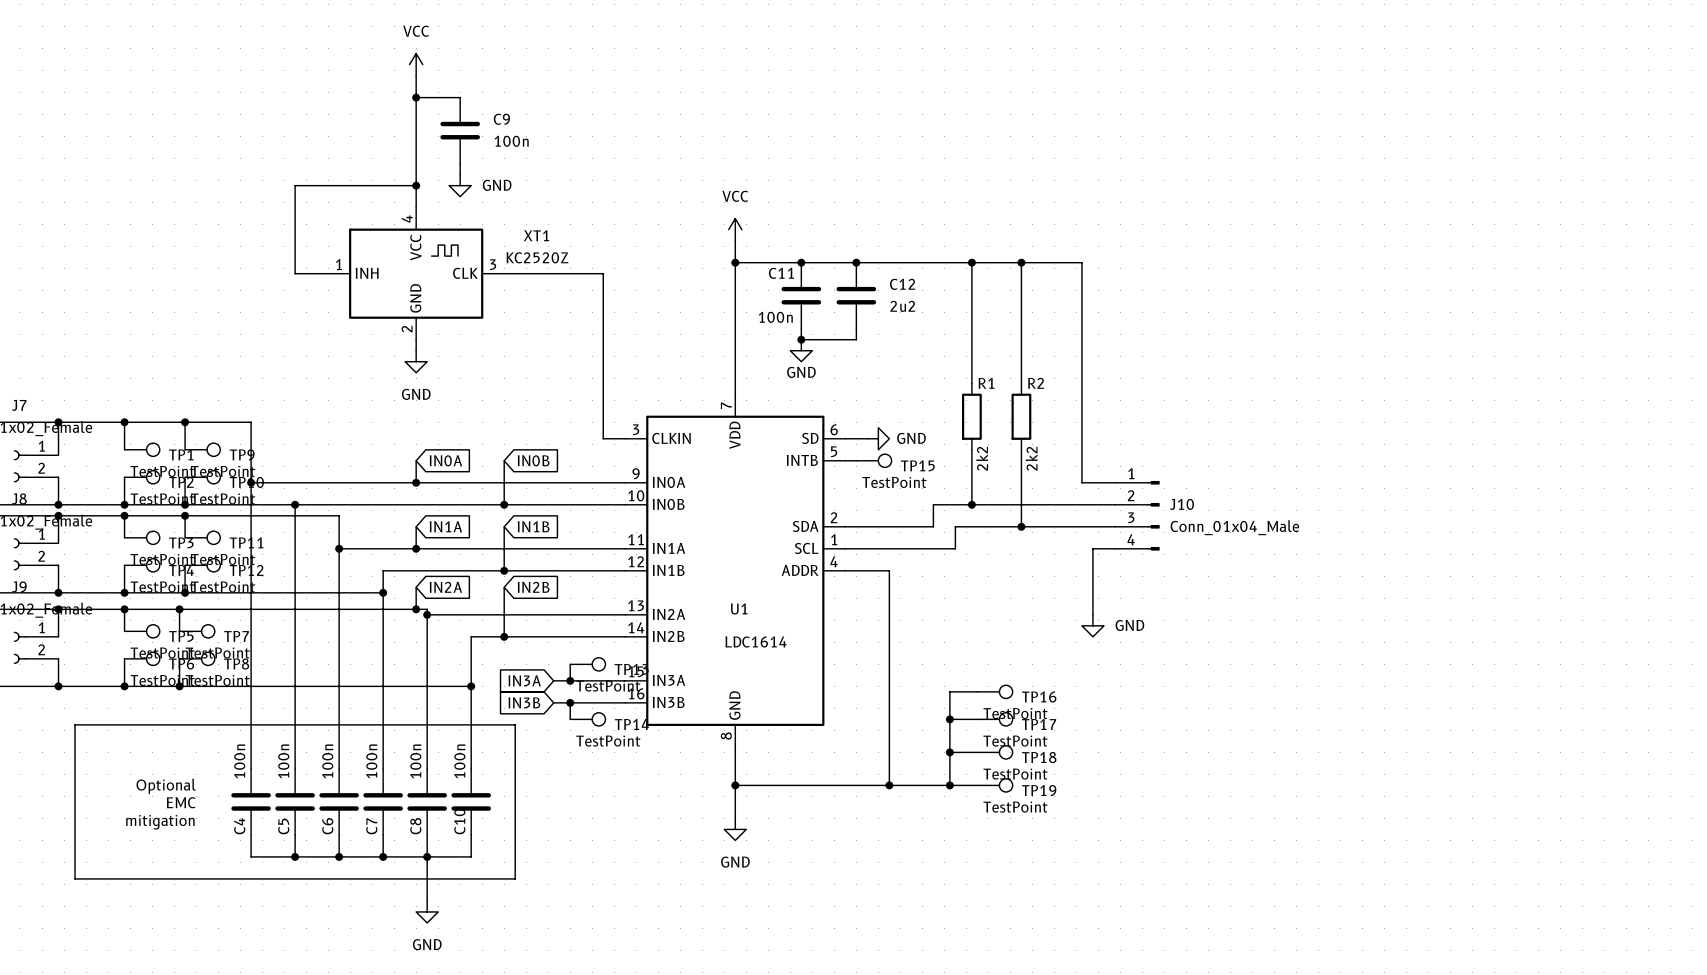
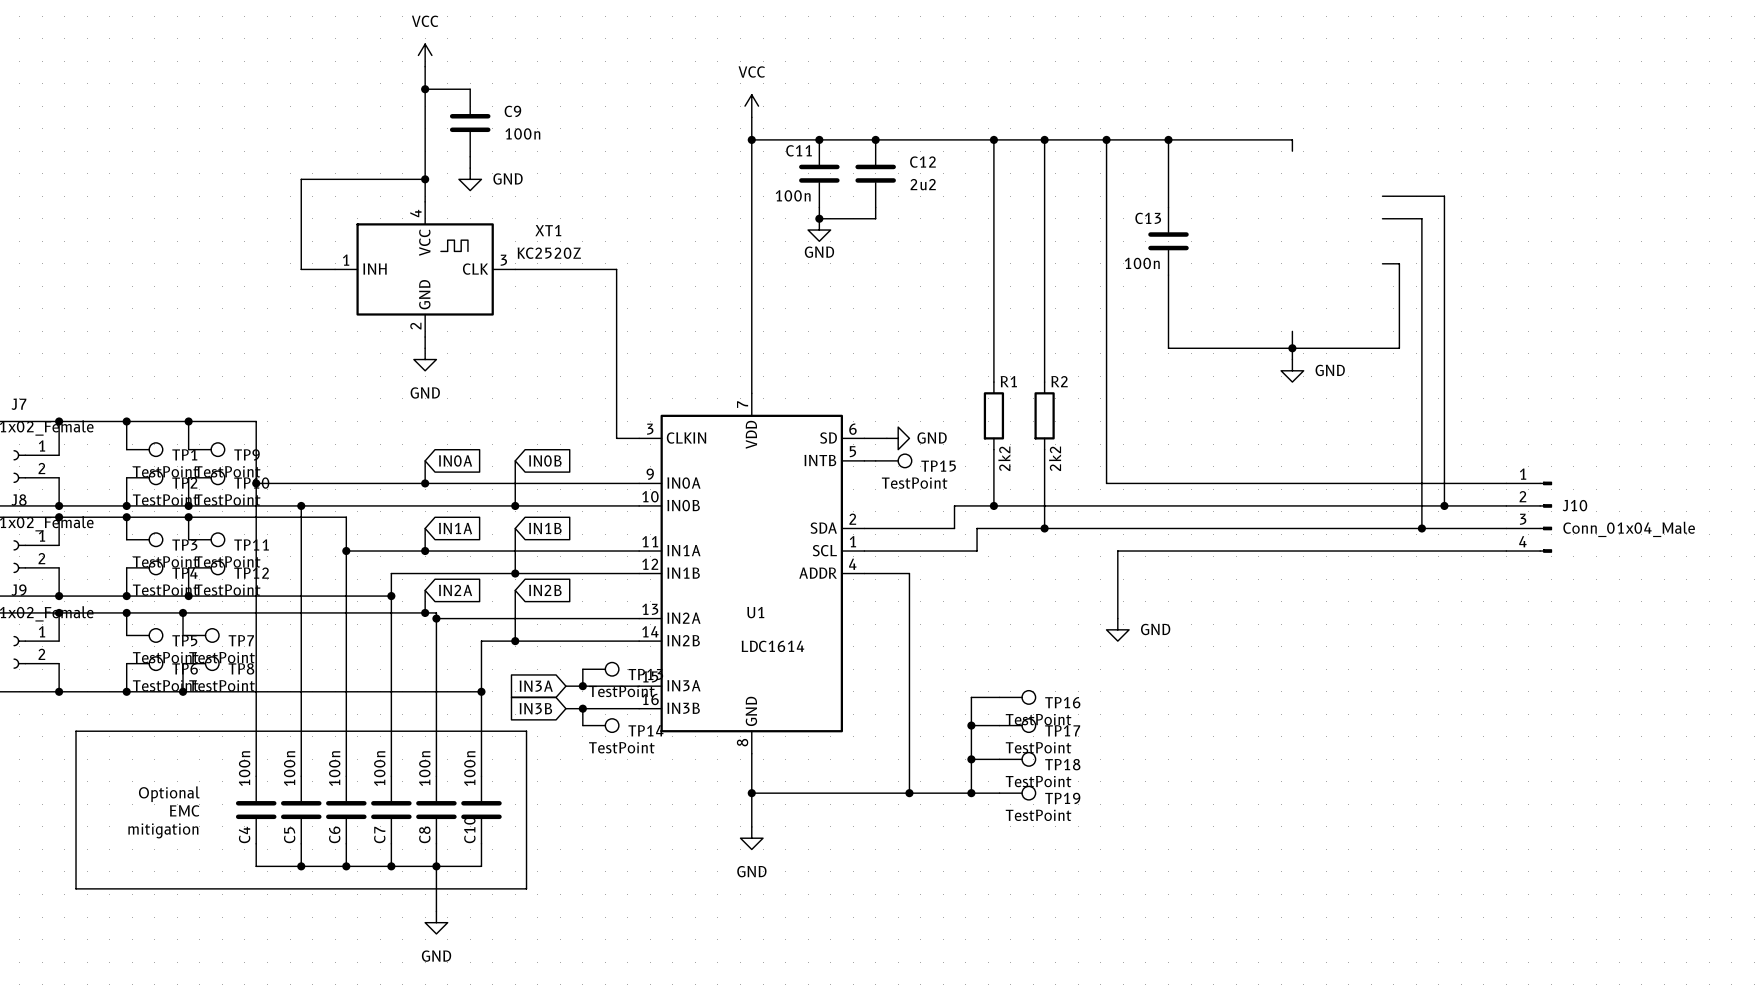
wire: none -> (751, 117) (751, 235)
wire: none -> (751, 139) (1292, 139) (1292, 151)
junction: none -> (751, 139)
junction: none -> (819, 139)
junction: none -> (875, 139)
wire: none -> (993, 139) (993, 258)
junction: none -> (993, 139)
wire: none -> (1044, 139) (1044, 258)
junction: none -> (1044, 139)
junction: none -> (1106, 139)
wire: none -> (1168, 139) (1168, 207)
junction: none -> (1168, 139)
wire: none -> (1382, 196) (1444, 196) (1444, 505)
junction: none -> (819, 218)
wire: none -> (1382, 218) (1421, 218) (1421, 528)
power symbol position: VCC (735, 229) -> VCC (751, 106)
C13: none -> 100n (1168, 241)
wire: (735, 262) (1081, 262) -> (1106, 139) (1106, 258)
junction: (735, 262) -> none
junction: (801, 262) -> none
junction: (856, 262) -> none
junction: (971, 262) -> none
junction: (1021, 262) -> none
wire: none -> (1382, 263) (1399, 263) (1399, 348) (1168, 348) (1168, 275)
C11 position: (801, 295) -> (819, 173)
C12 position: (856, 295) -> (875, 173)
wire: (801, 328) (801, 339) (856, 339) (856, 328) -> (819, 207) (819, 218) (875, 218) (875, 207)
wire: none -> (1292, 331) (1292, 359)
junction: (801, 339) -> none
power symbol position: GND (801, 350) -> GND (819, 230)
junction: none -> (1292, 348)
power symbol: none -> GND (1292, 370)
wire: none -> (1140, 483) (1506, 483)
wire: none -> (1140, 505) (1506, 505)
junction: none -> (1444, 505)
J10 position: (1137, 515) -> (1529, 517)
wire: none -> (1140, 528) (1506, 528)
junction: none -> (1421, 528)
wire: none -> (1140, 551) (1506, 551)

